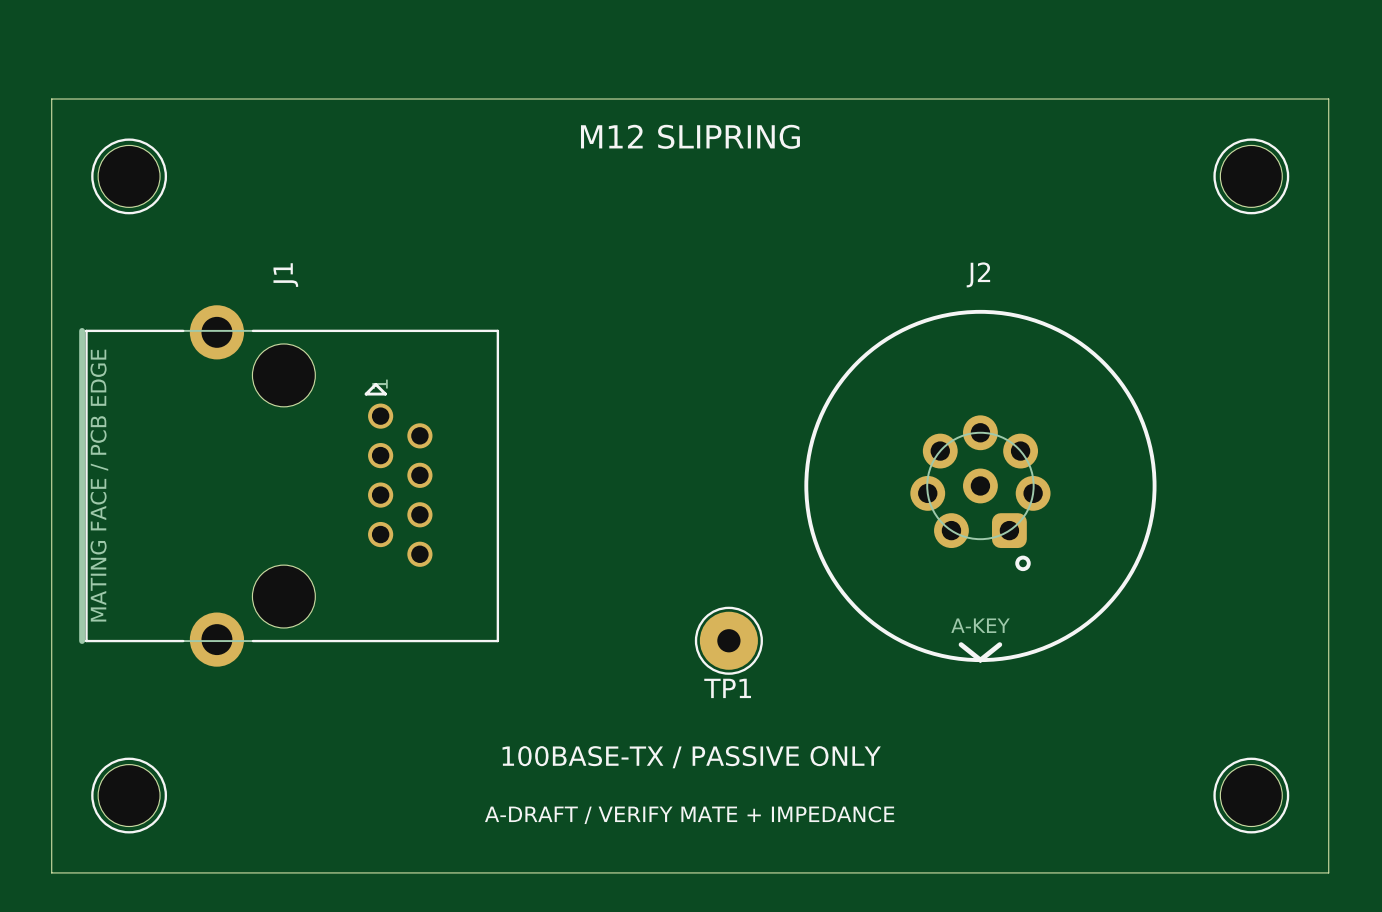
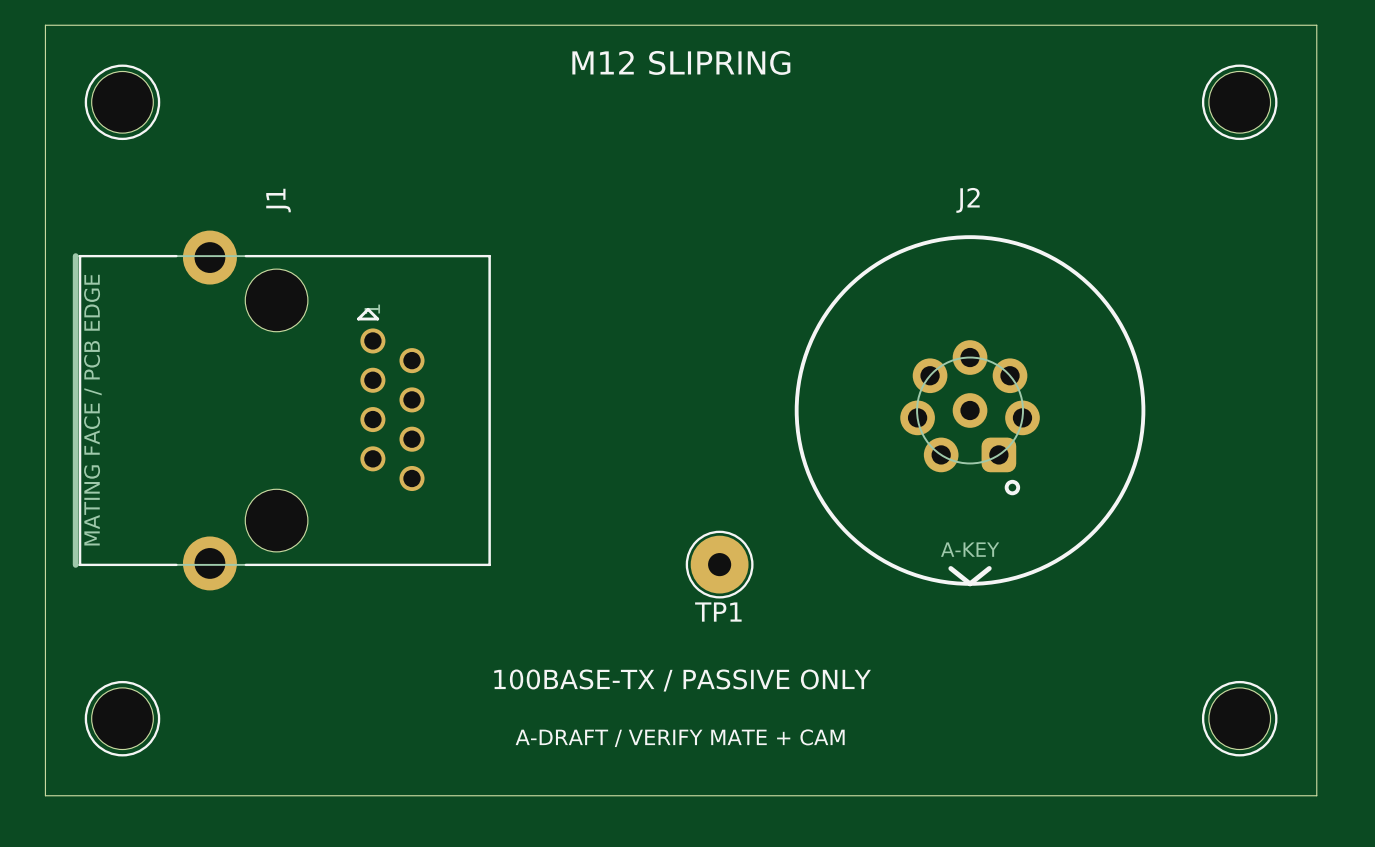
text: A-DRAFT / VERIFY MATE + IMPEDANCE (689, 815) -> A-DRAFT / VERIFY MATE + CAM (680, 738)

